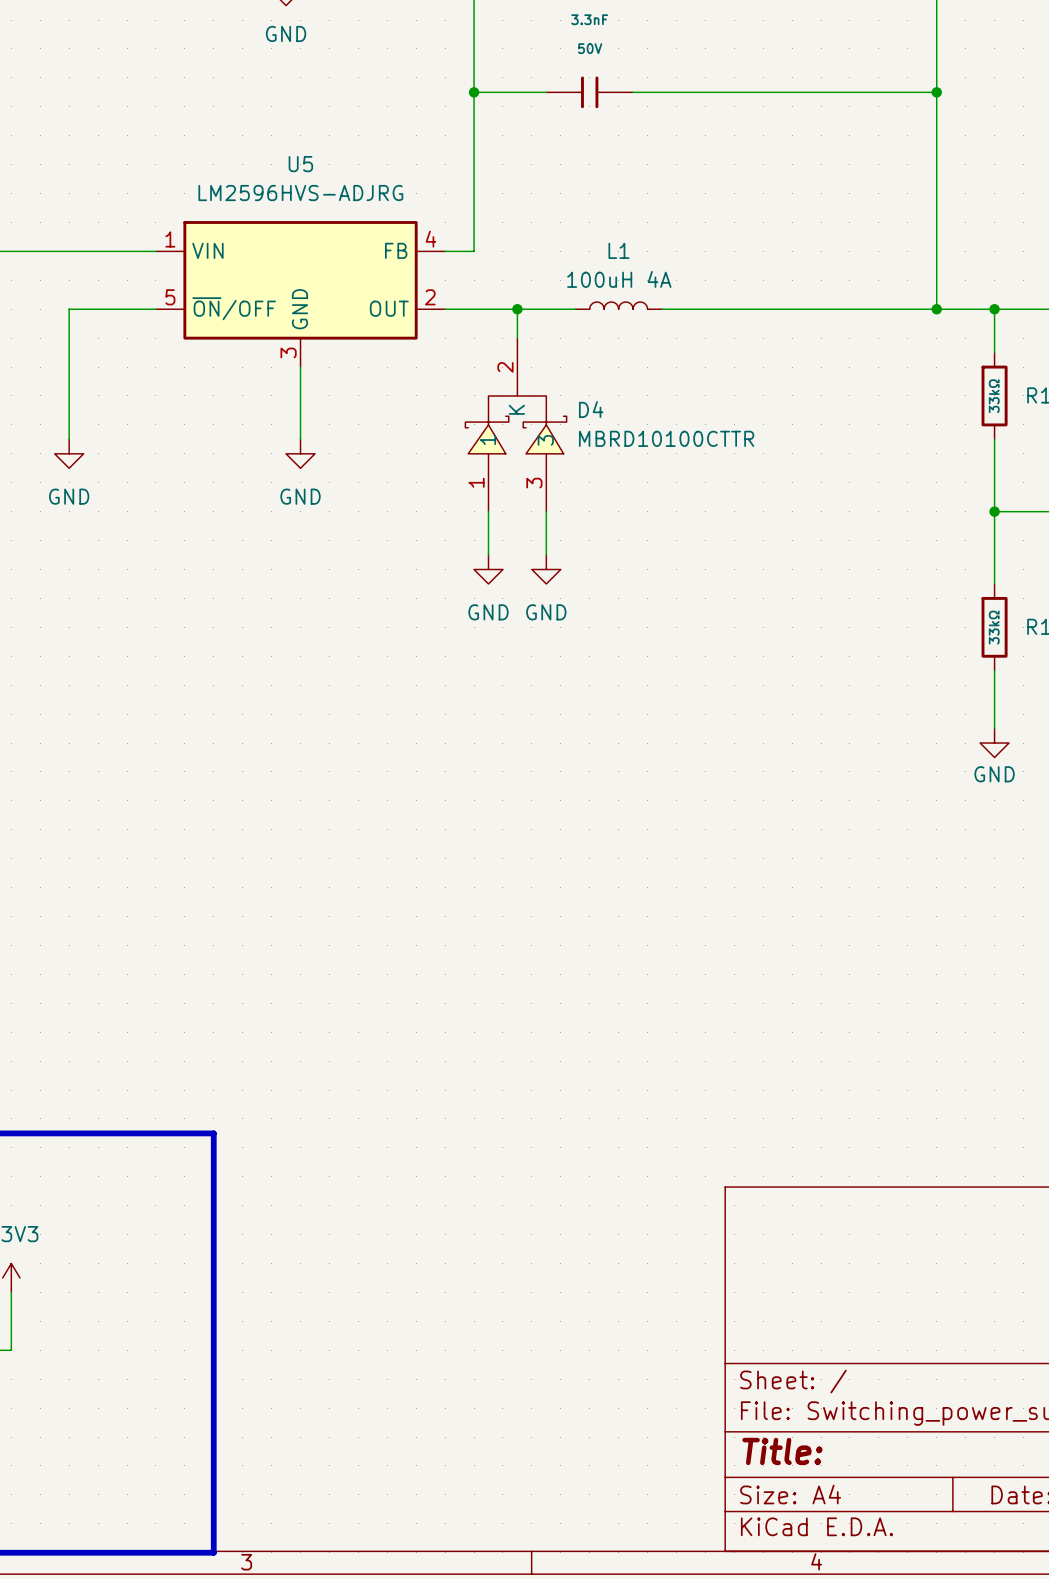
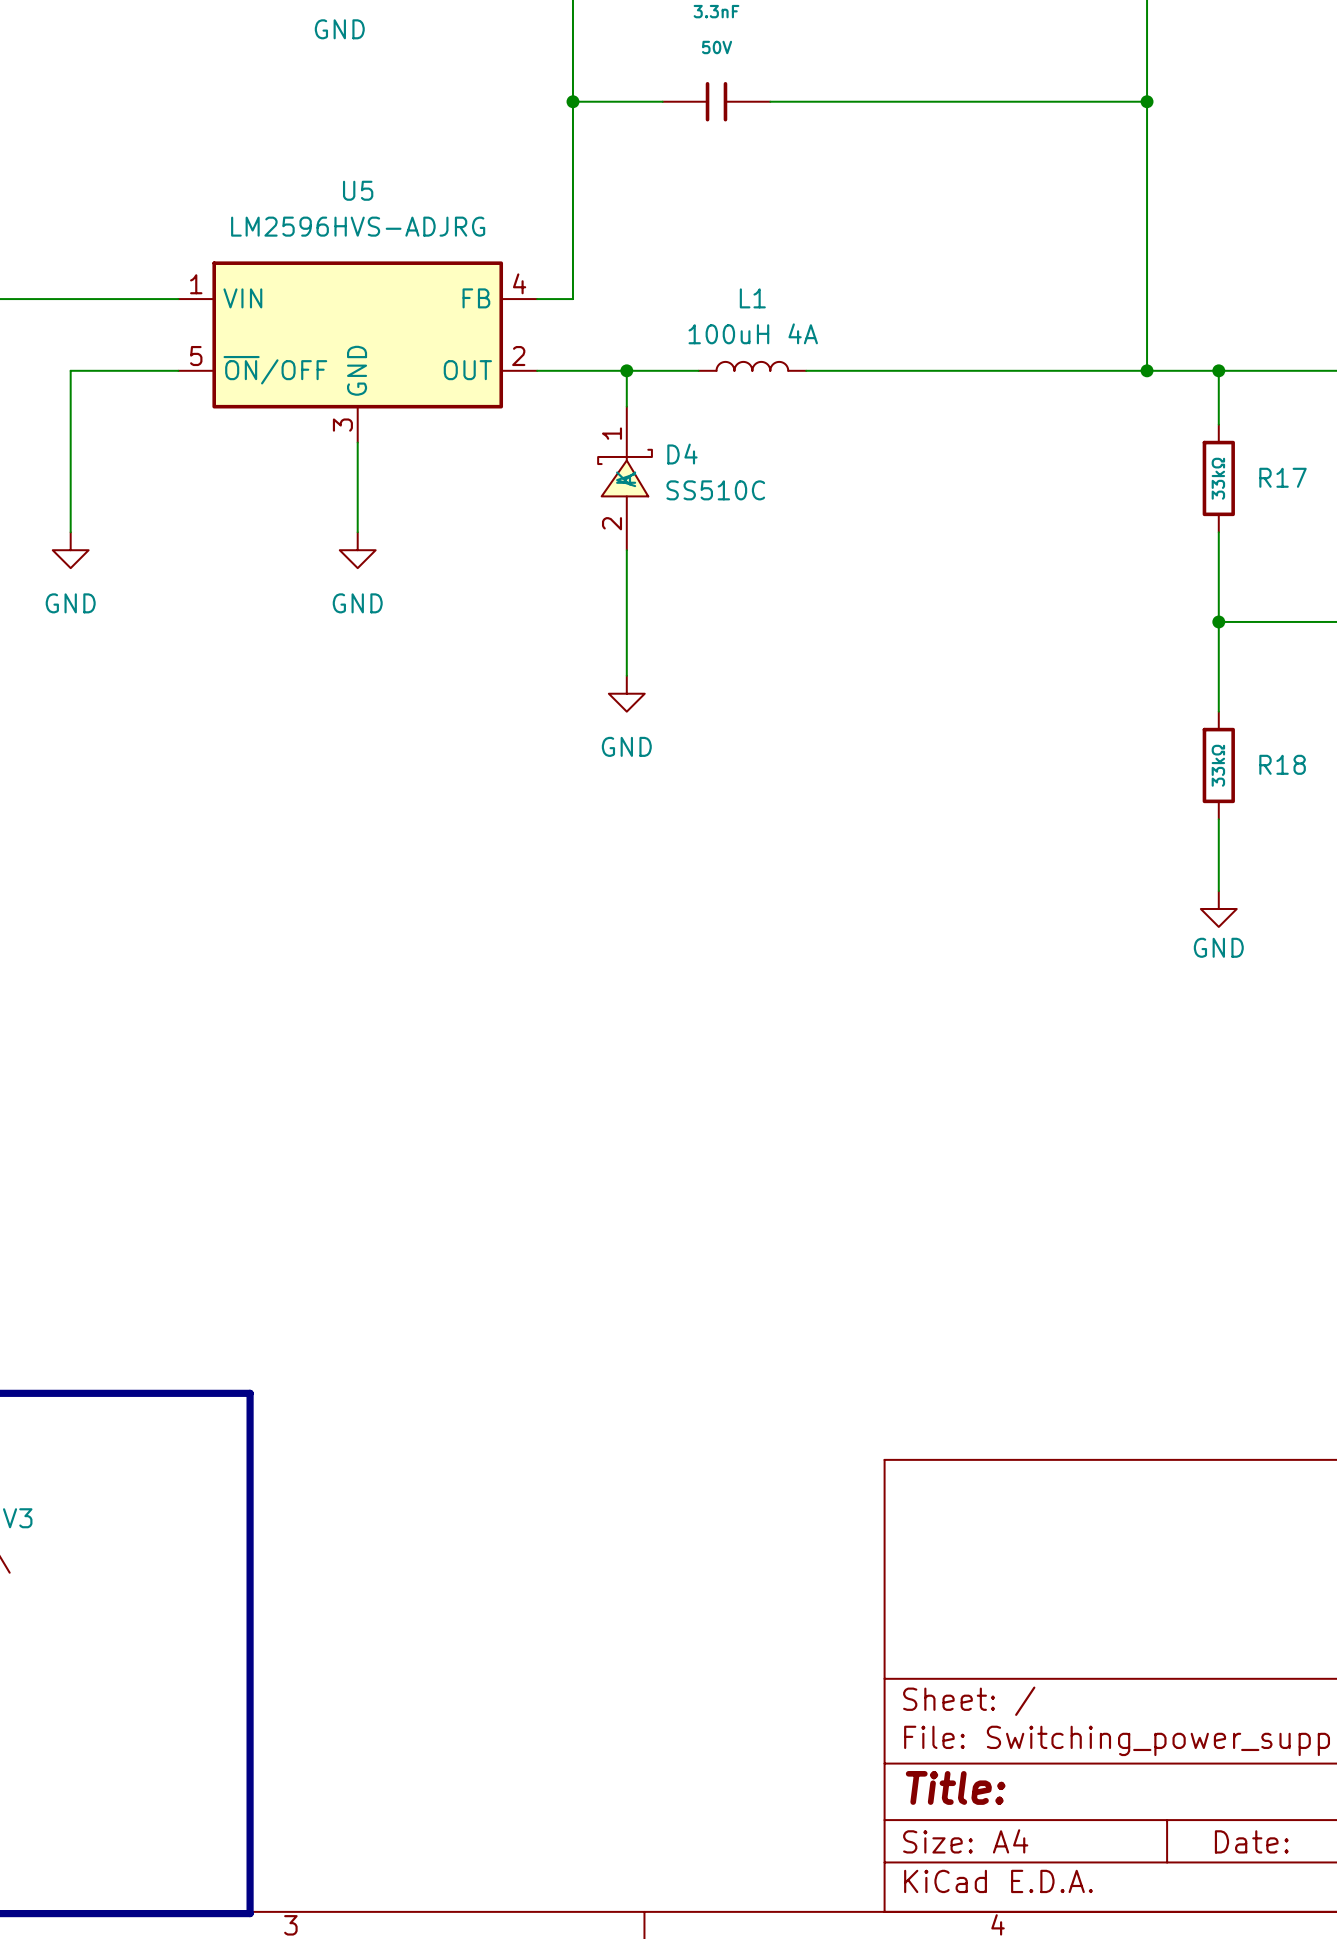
D4 symbol: [465, 338, 567, 512] -> [598, 406, 652, 551]
D4 name position: D4 (591, 409) -> D4 (682, 454)
D4 value: MBRD10100CTTR (666, 438) -> SS510C (715, 490)
wire: none -> (626, 550) (626, 675)
wire: (488, 511) (488, 555) -> none
wire: (546, 511) (546, 555) -> none
power symbol: GND (488, 569) -> none
power symbol: none -> GND (626, 693)
power symbol: GND (546, 569) -> none

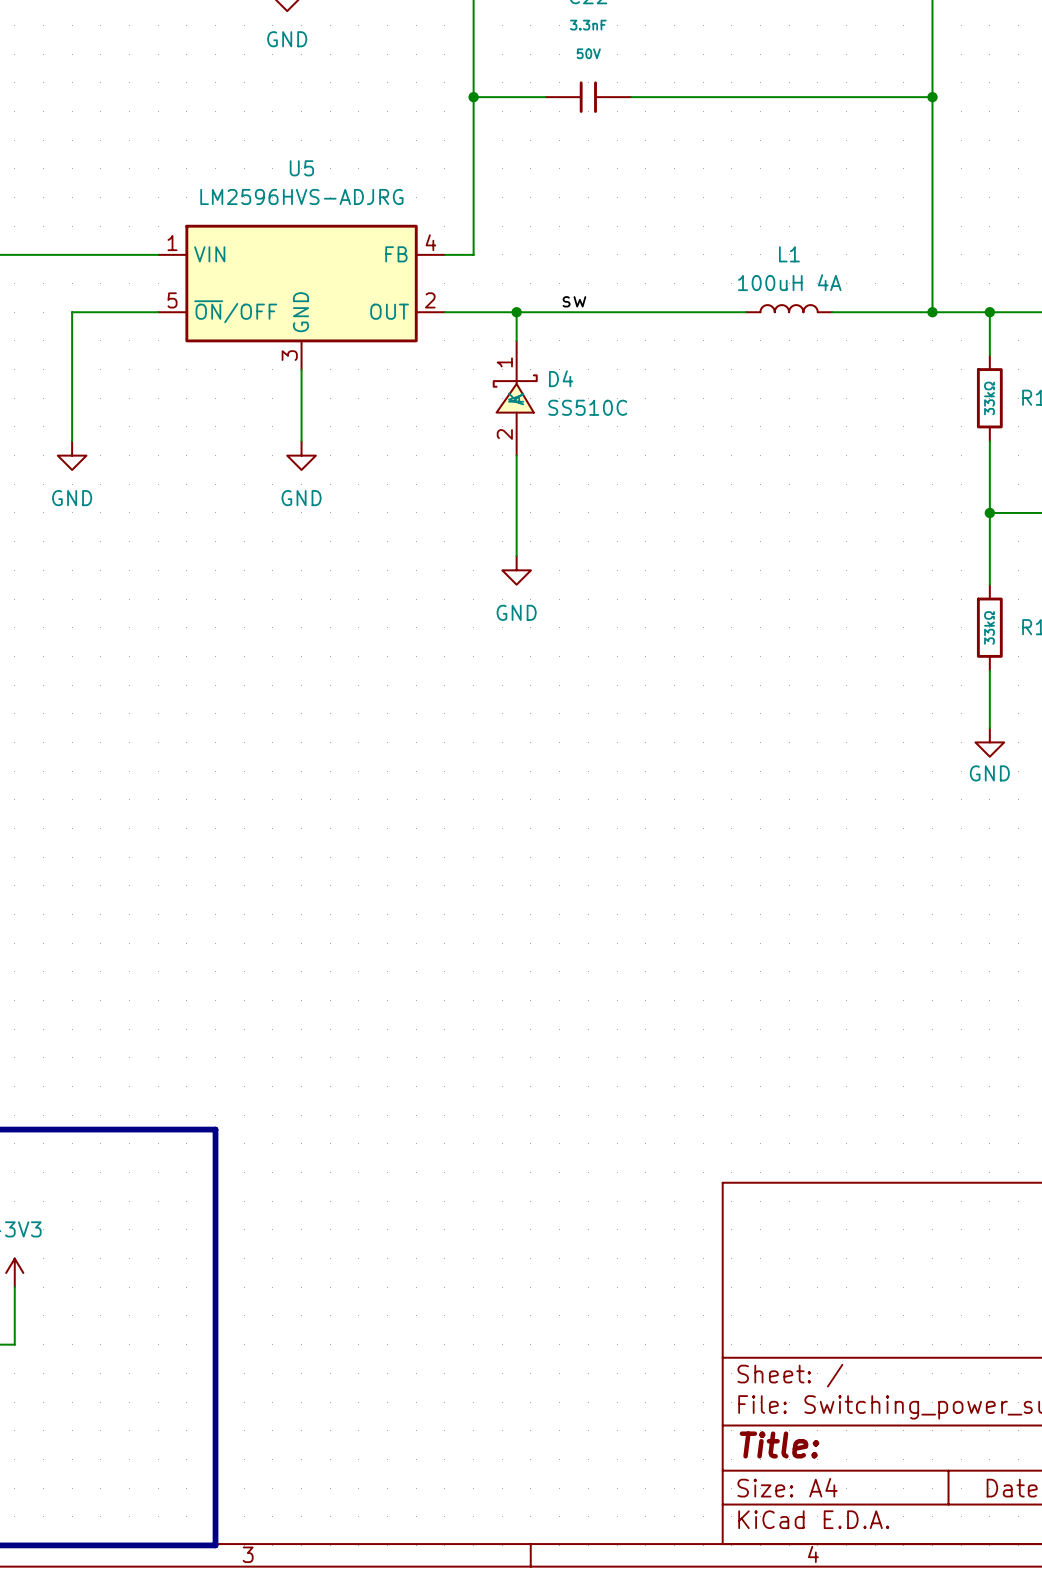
label: none -> sw (574, 301)
L1 position: (752, 366) -> (789, 308)
wire: (913, 370) (1021, 370) -> (574, 312) (660, 312)

